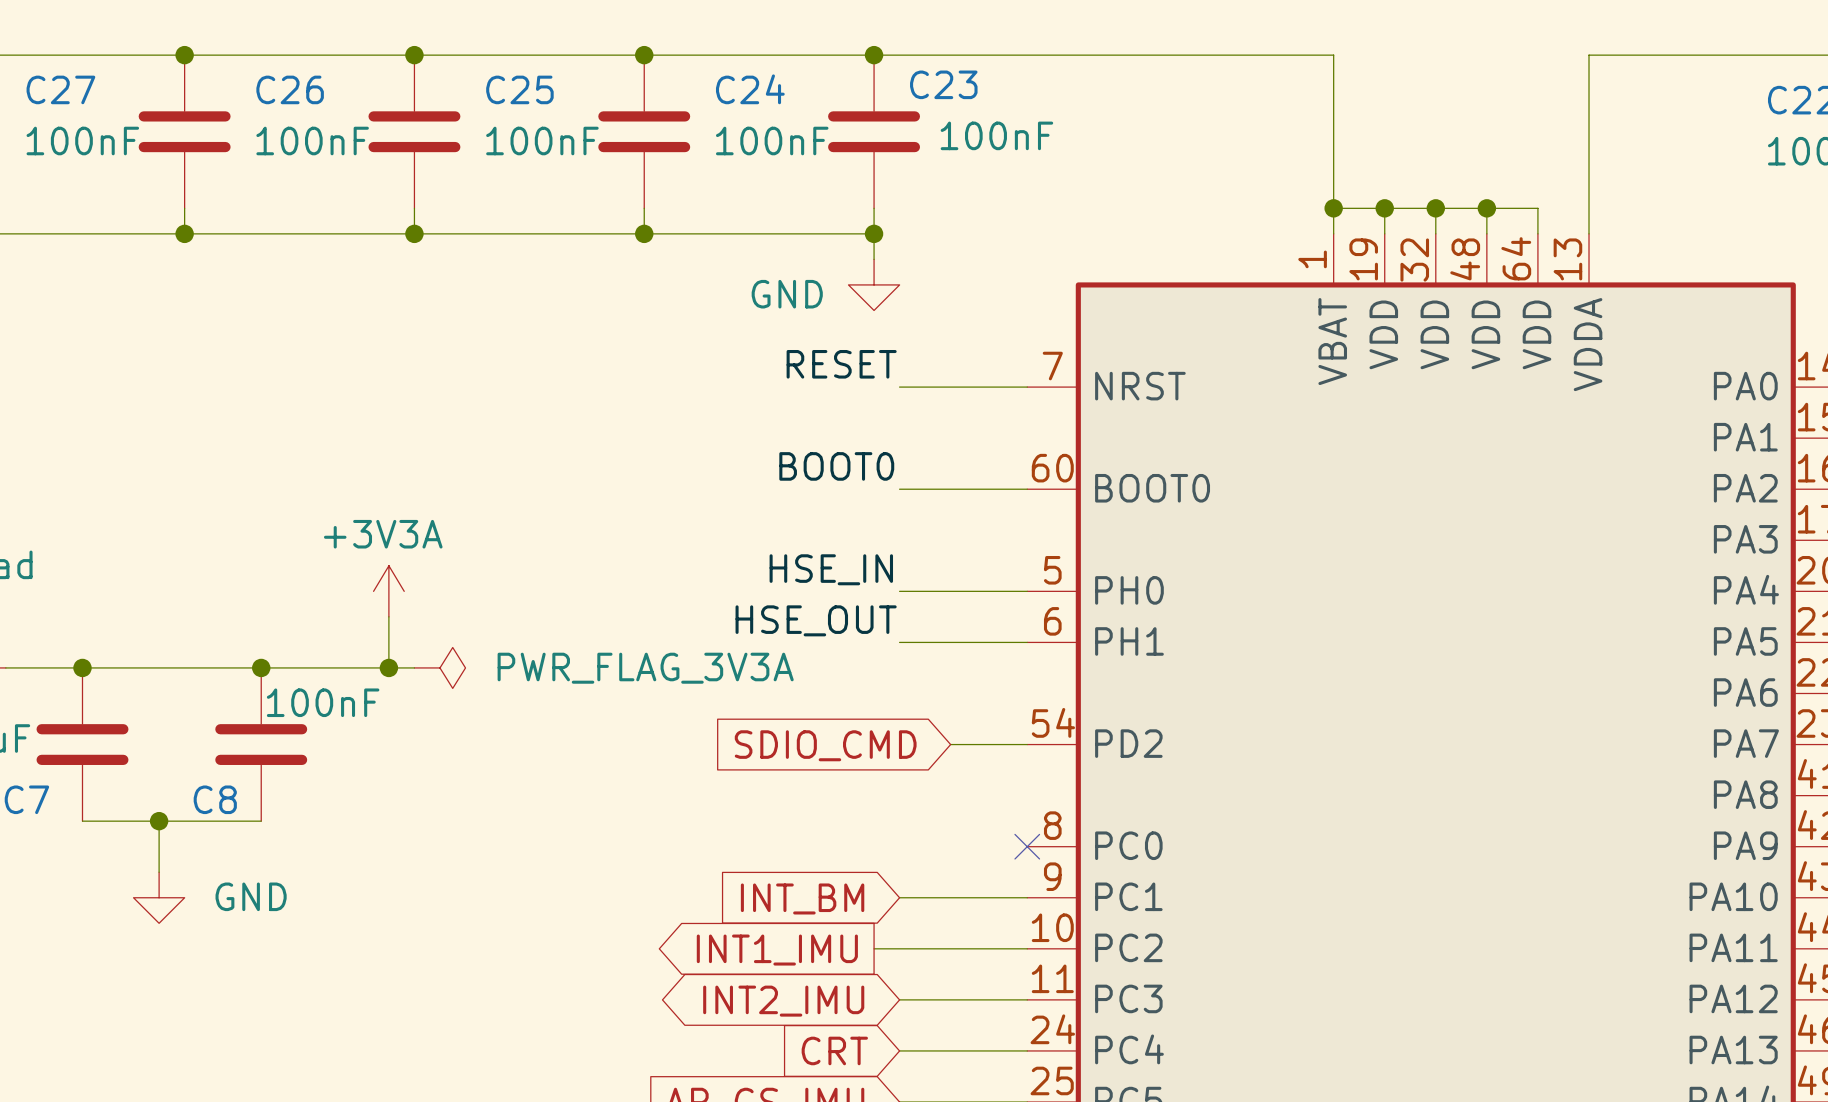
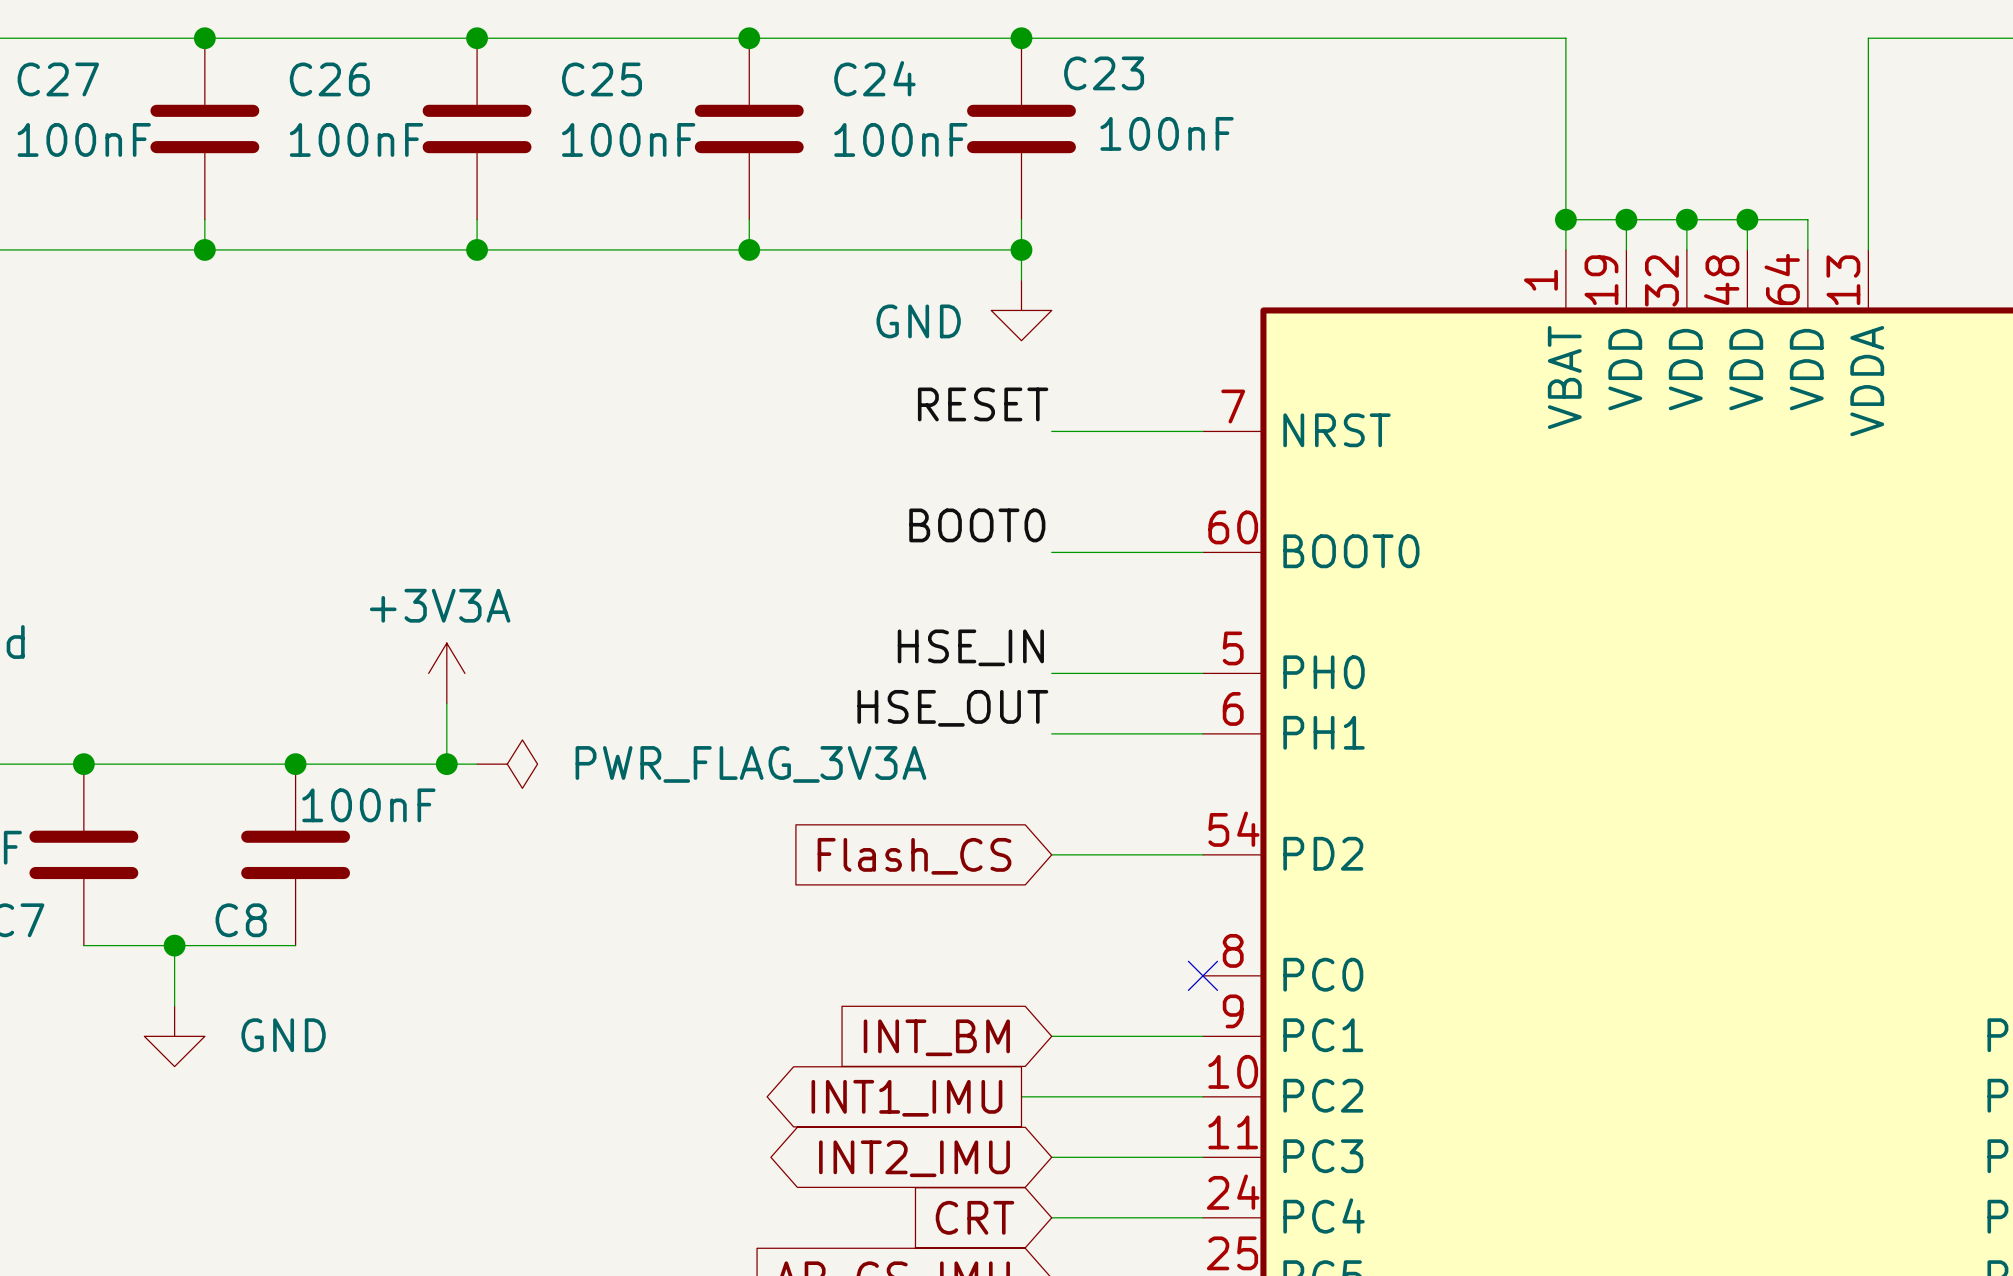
wire: none -> (1051, 854) (1112, 854)
global label: none -> Flash_CS (914, 856)
global label: SDIO_CMD (825, 745) -> none

